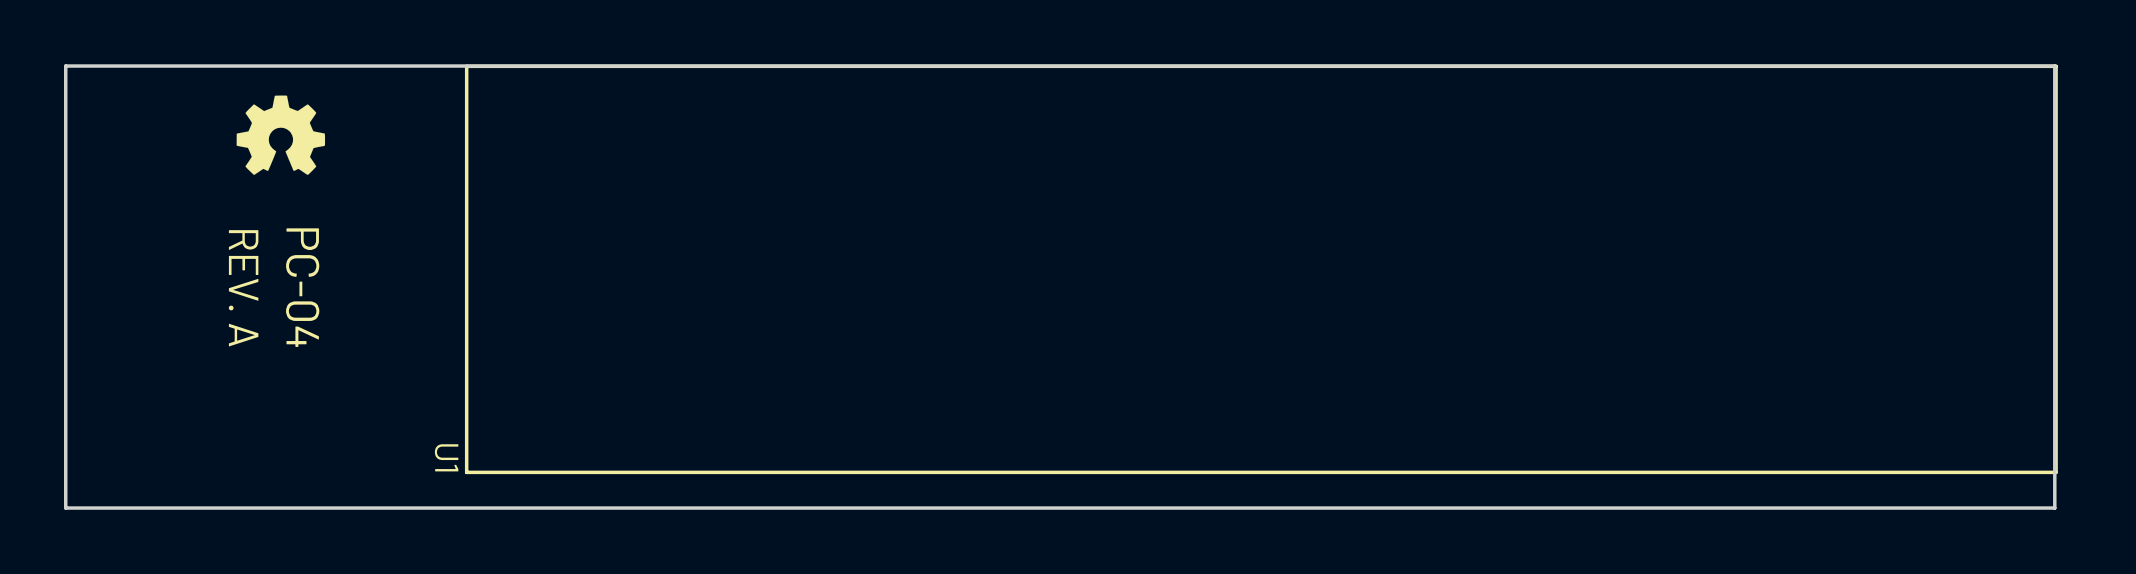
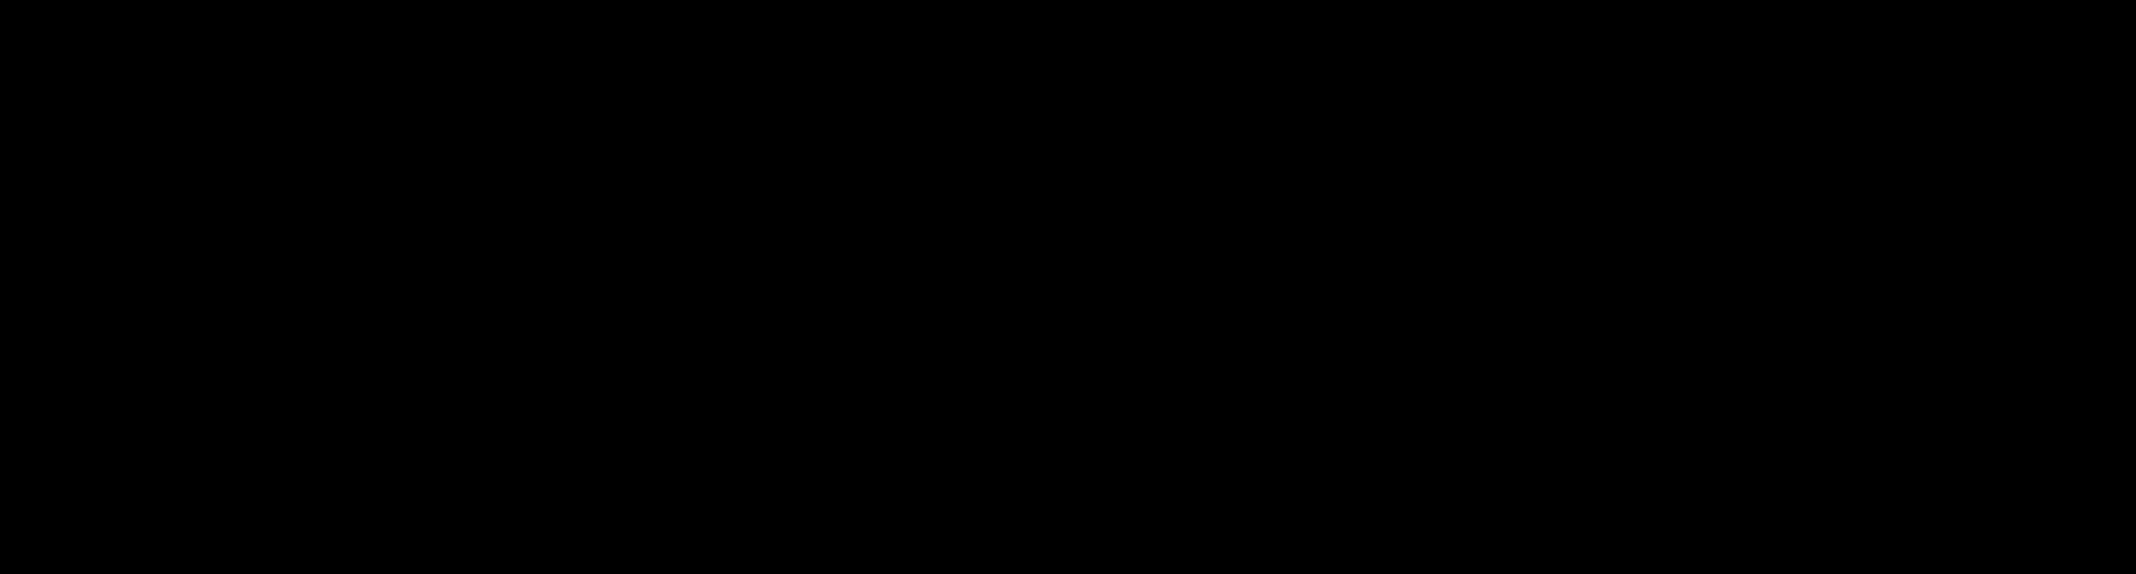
board edge: (2054, 66) (2054, 508) (65, 508) (65, 66) (2054, 66) -> none
drawing: [236, 95, 326, 175] -> none
U1: (1261, 269) -> none
text: PC-04 (302, 287) -> none
text: REV. A (243, 288) -> none

